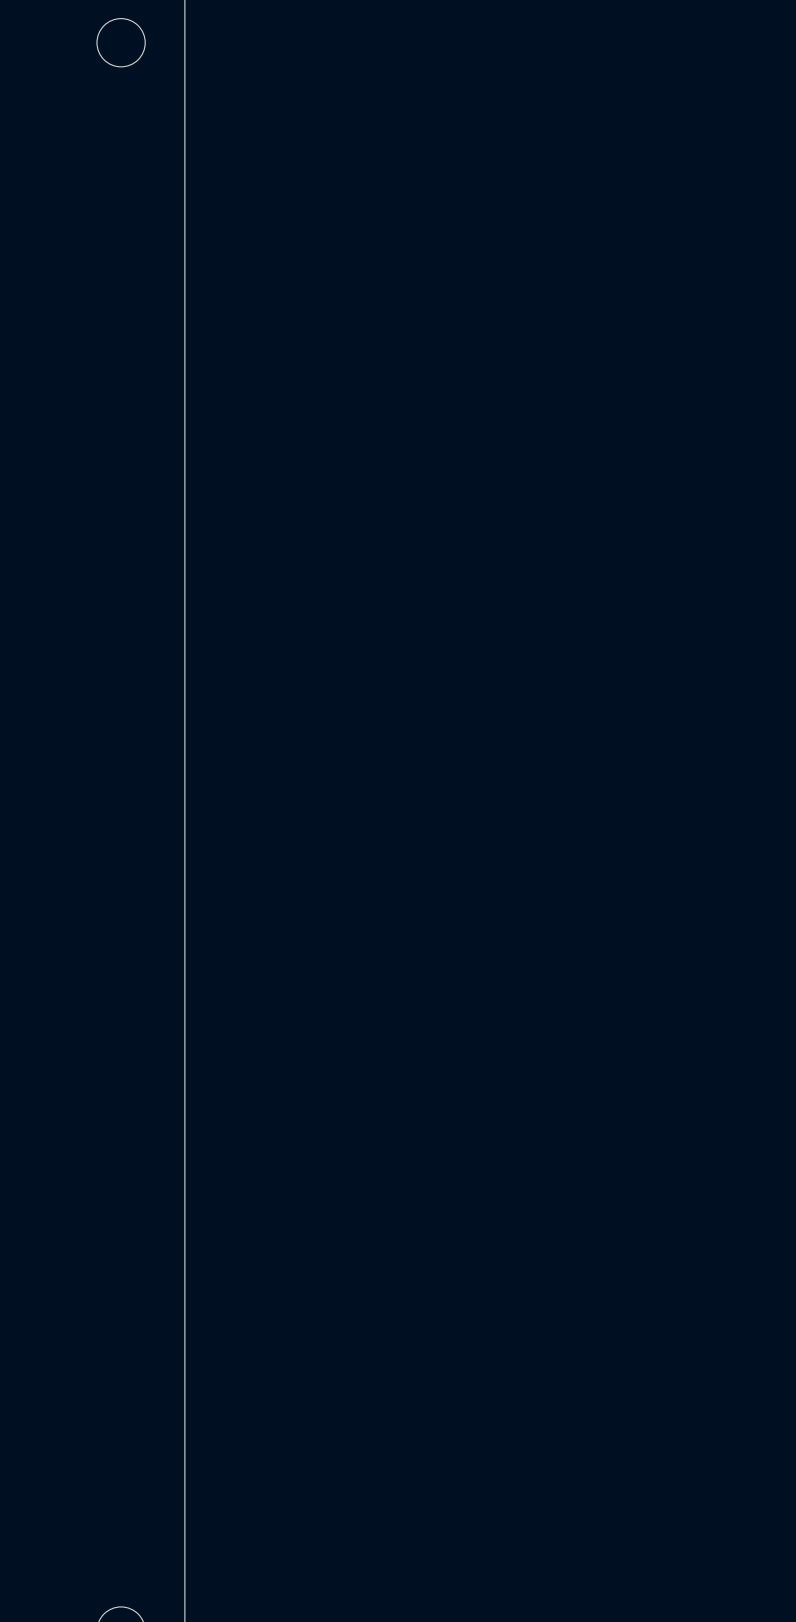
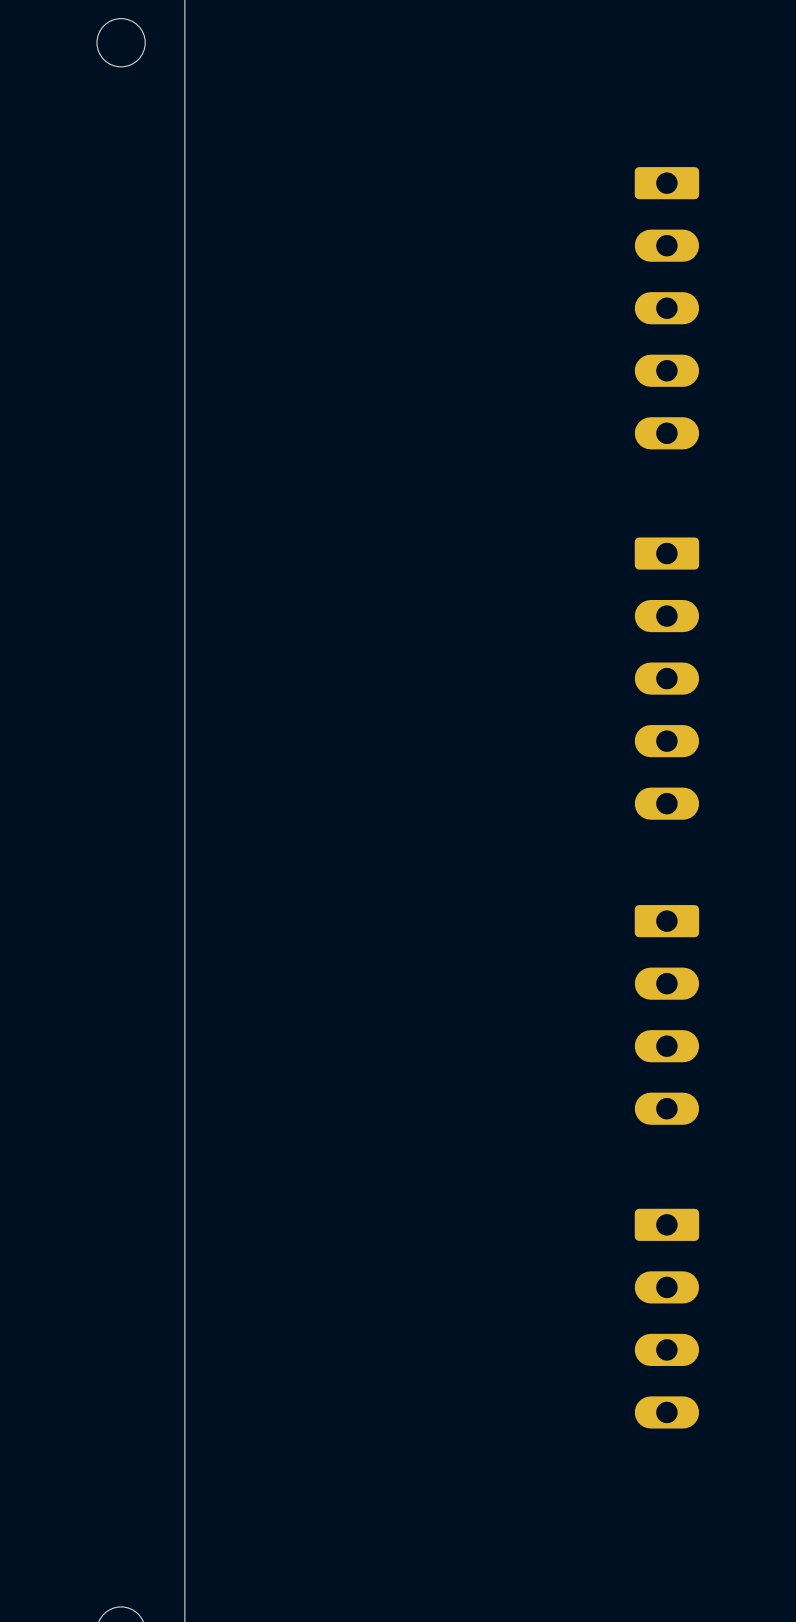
part: none -> (666, 308)
part: none -> (666, 678)
part: none -> (666, 1014)
part: none -> (666, 1318)

